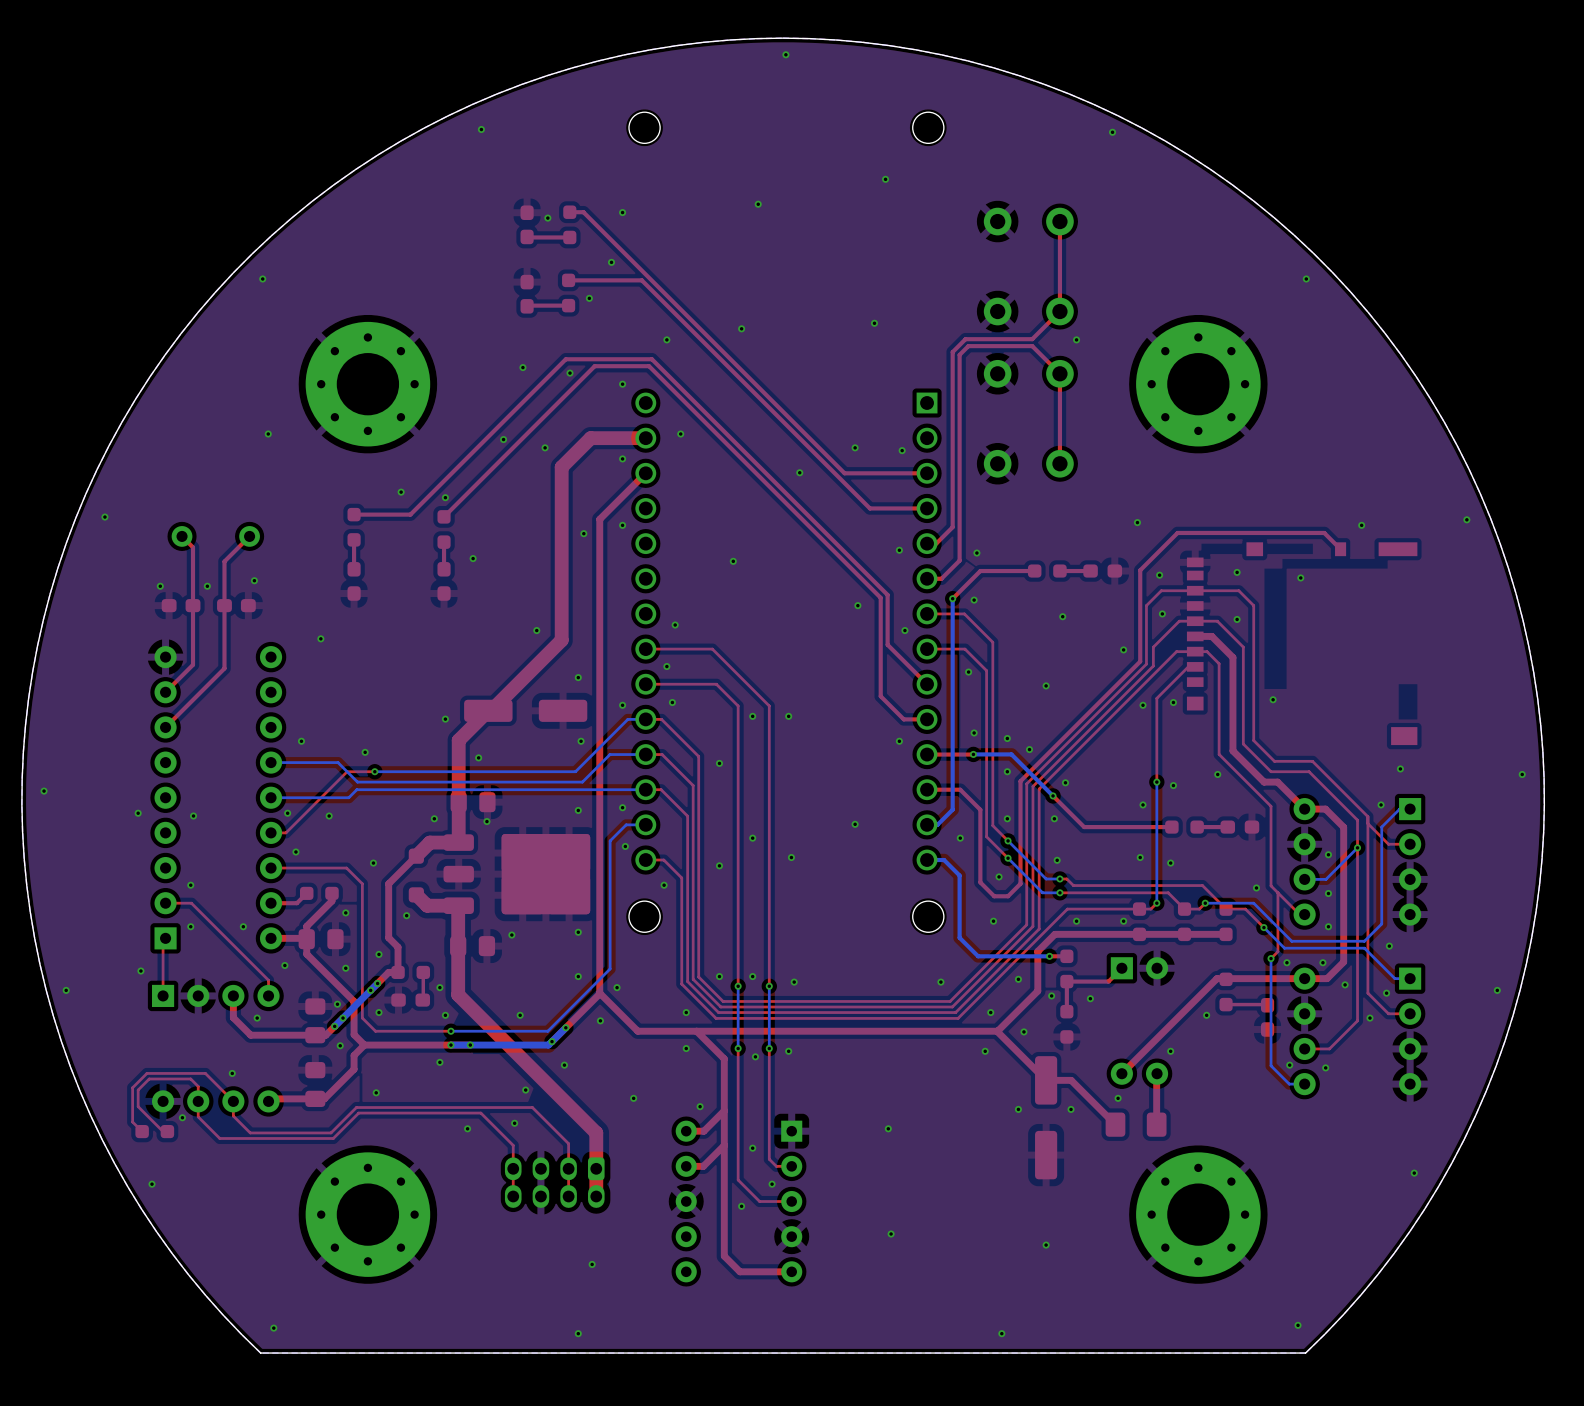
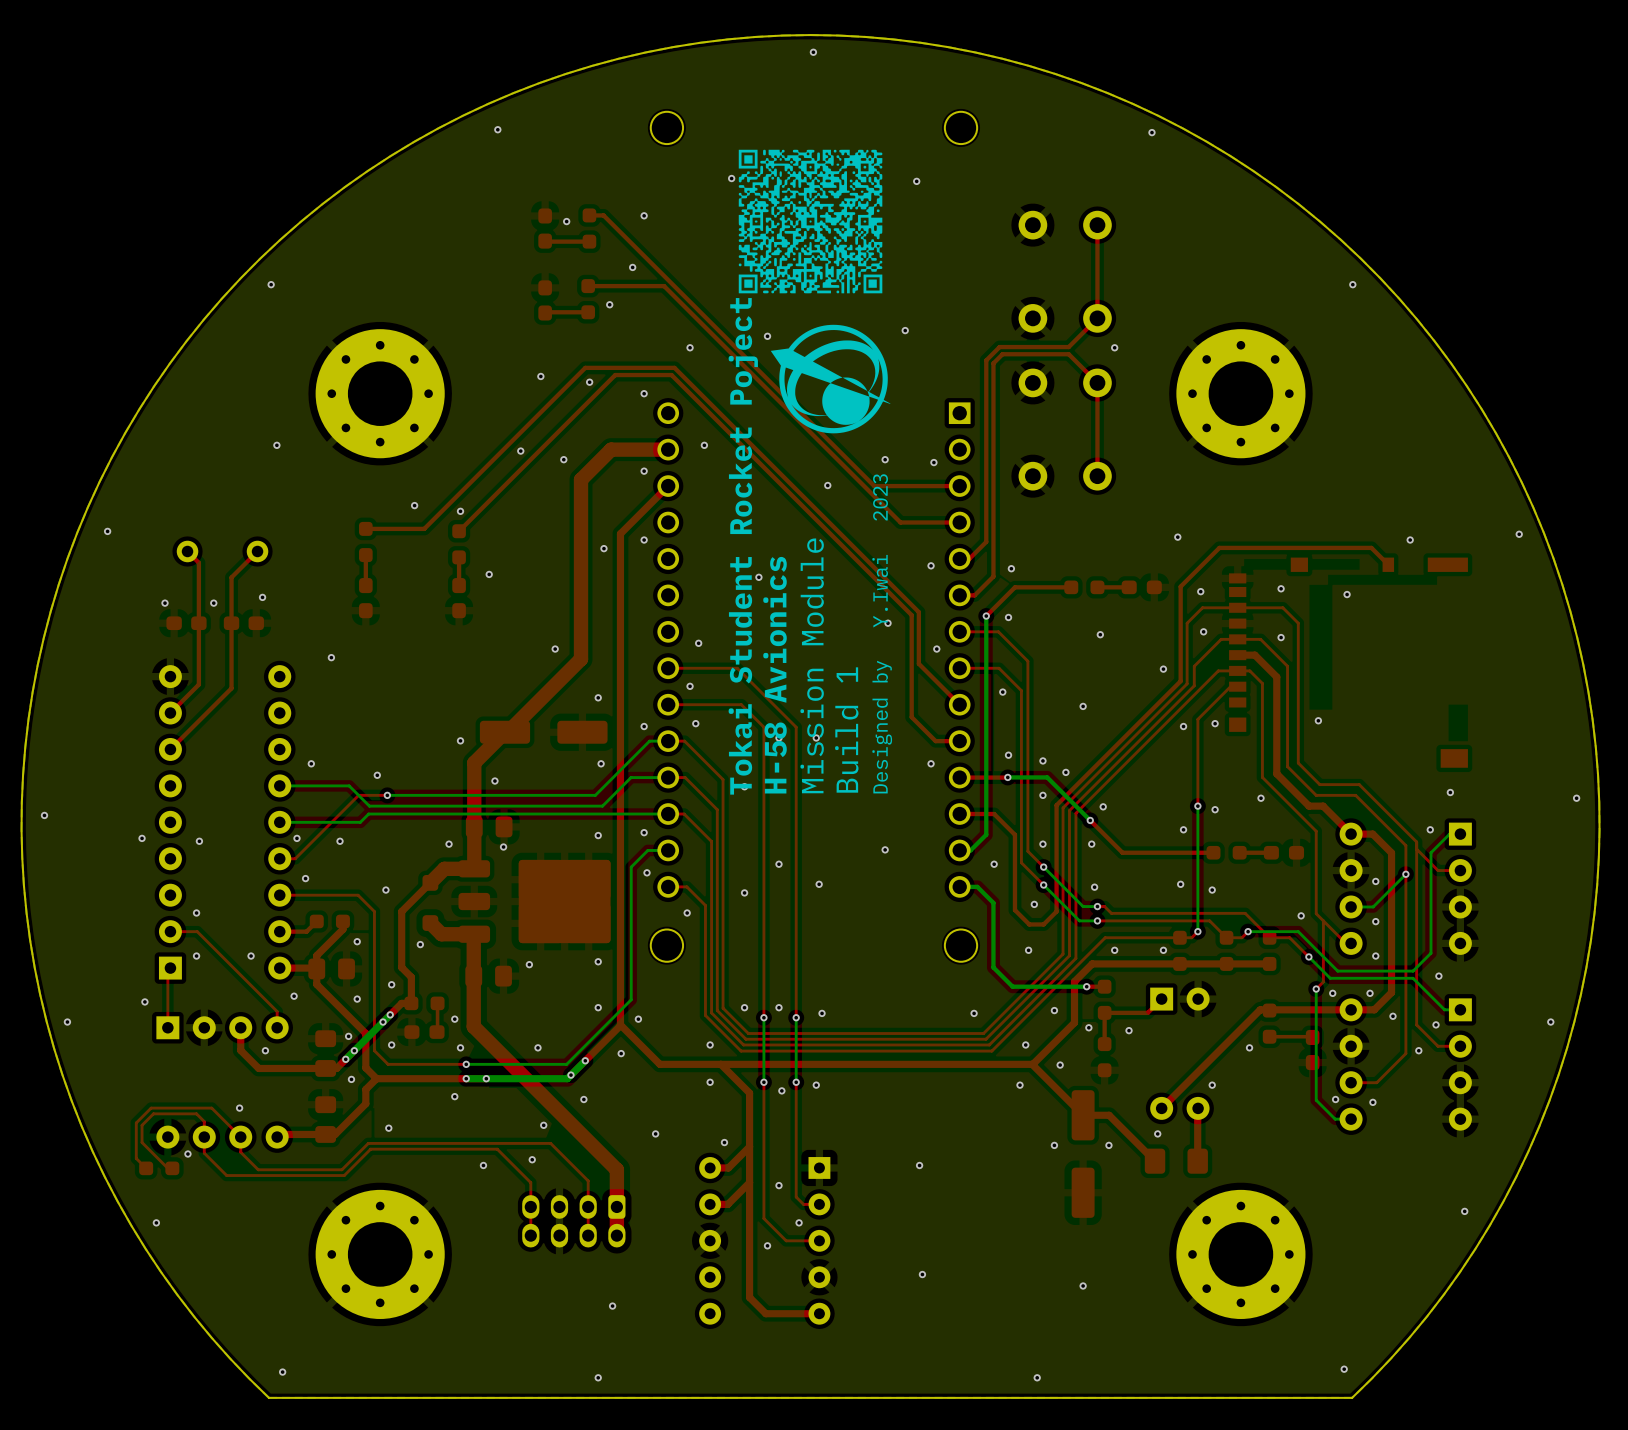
drawing: none -> [738, 149, 883, 294]
via position: (758, 204) -> (731, 178)
drawing: none -> [770, 324, 891, 434]
text: none -> Tokai Student Rocket Poject (743, 546)
text: none -> Designed by Y.Iwai 2023 (882, 633)
text: none -> H-58 Avionics (775, 675)
text: none -> Mission Module (812, 665)
text: none -> Build 1 (846, 729)

